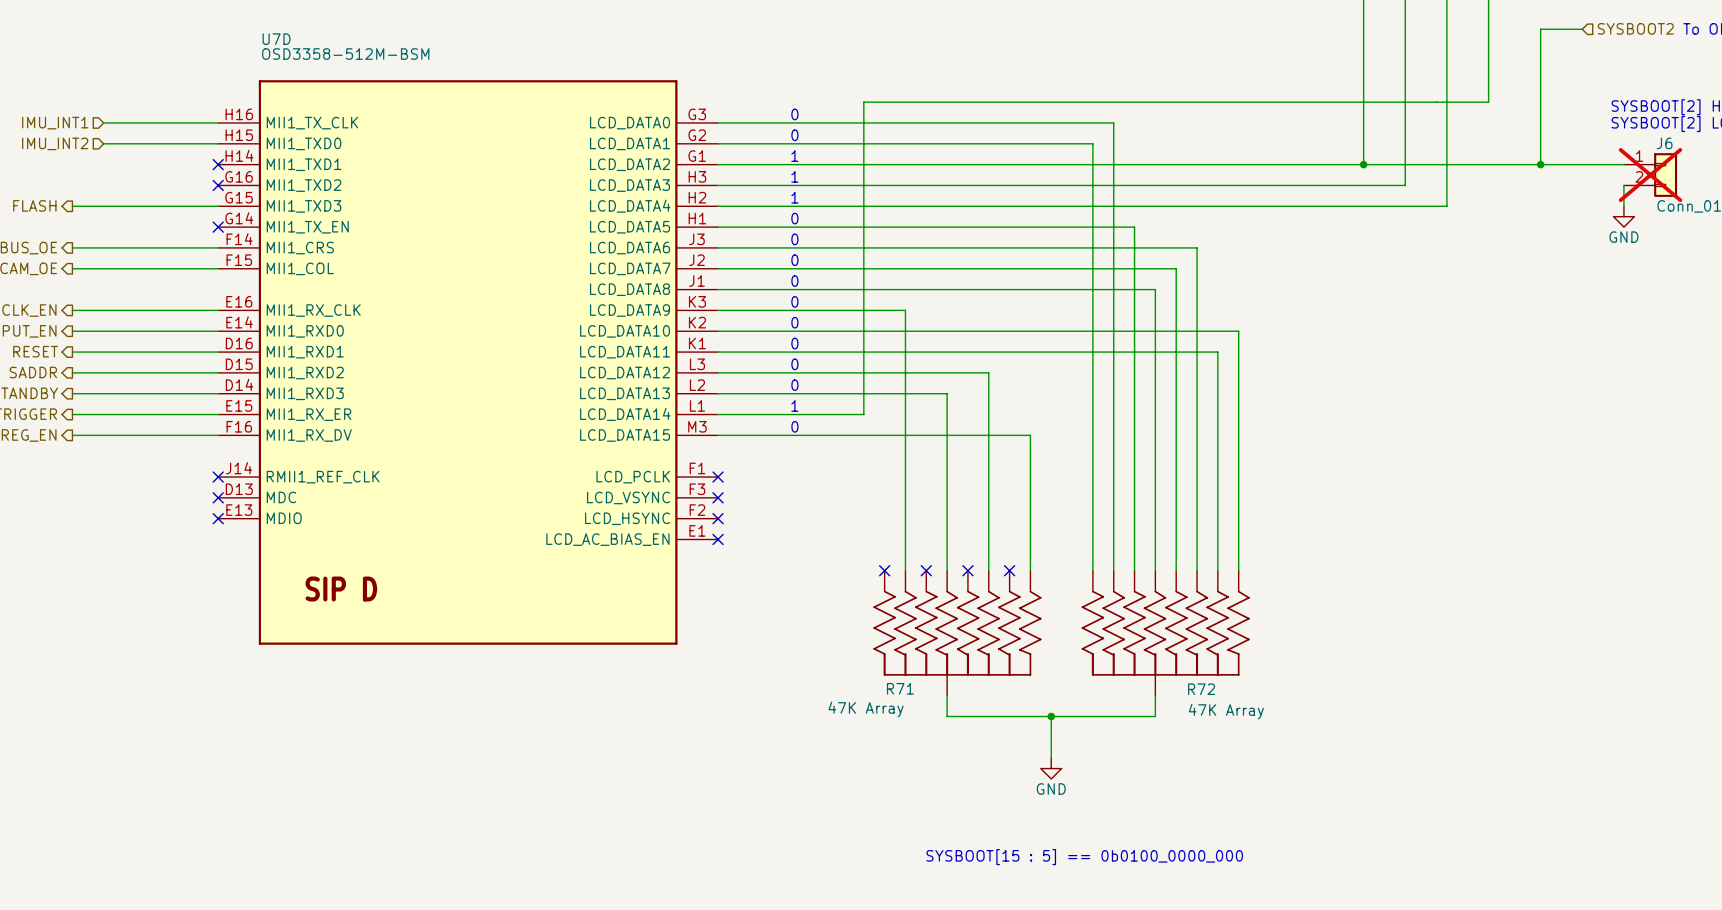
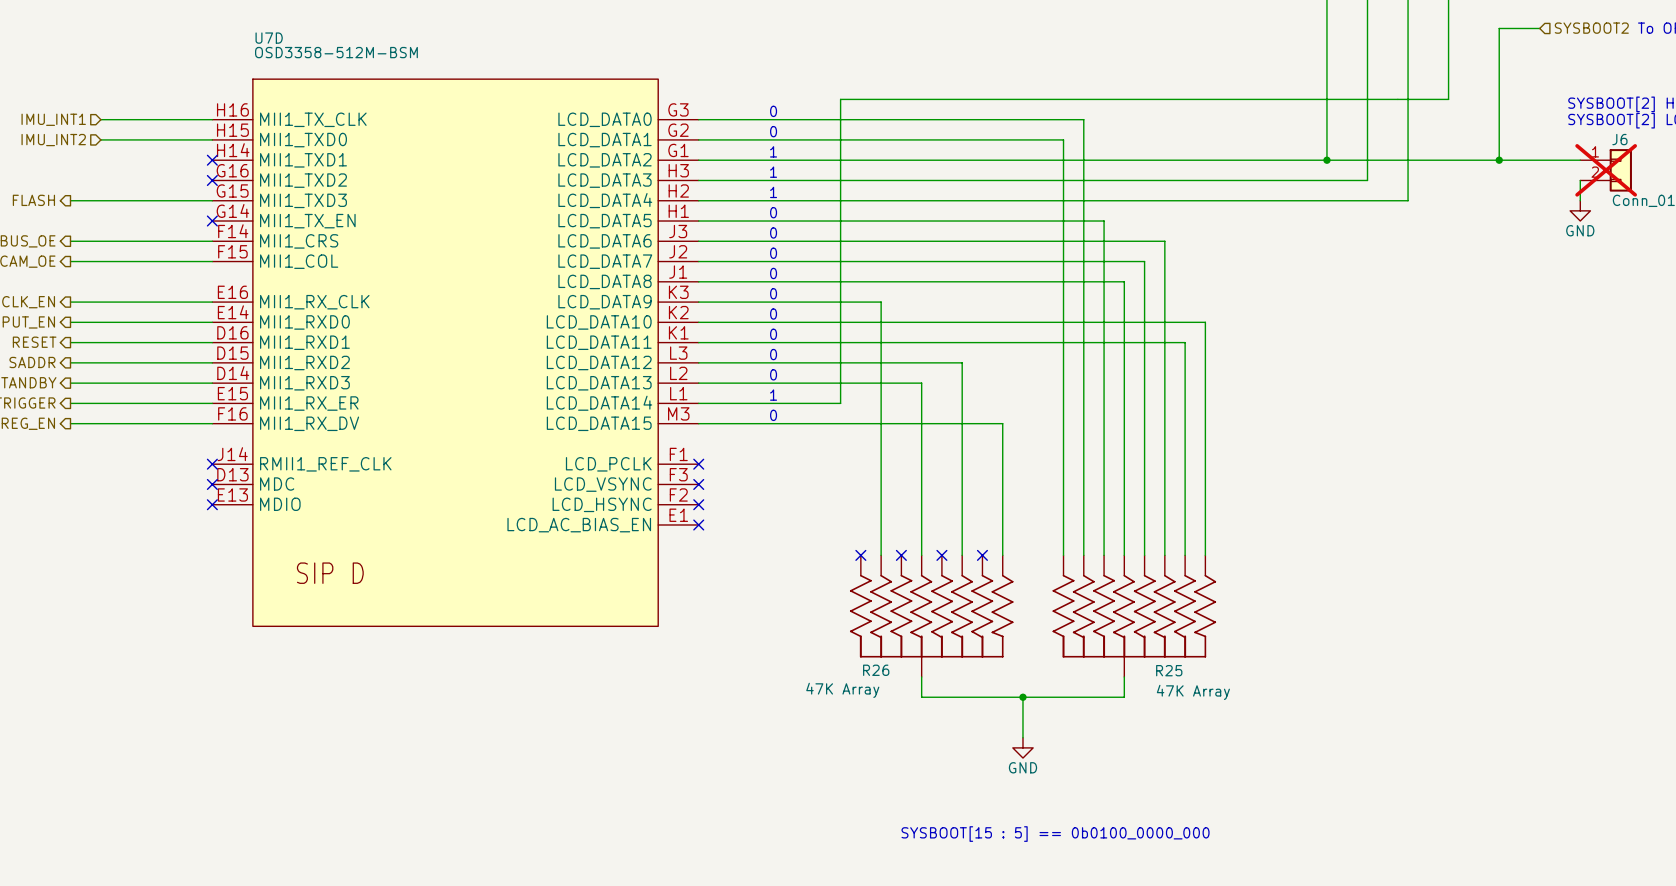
U7D symbol: [218, 80, 719, 645] -> [212, 79, 699, 627]
R71 name: R71 (900, 688) -> R26 (876, 670)
R72 name: R72 (1201, 689) -> R25 (1169, 670)

